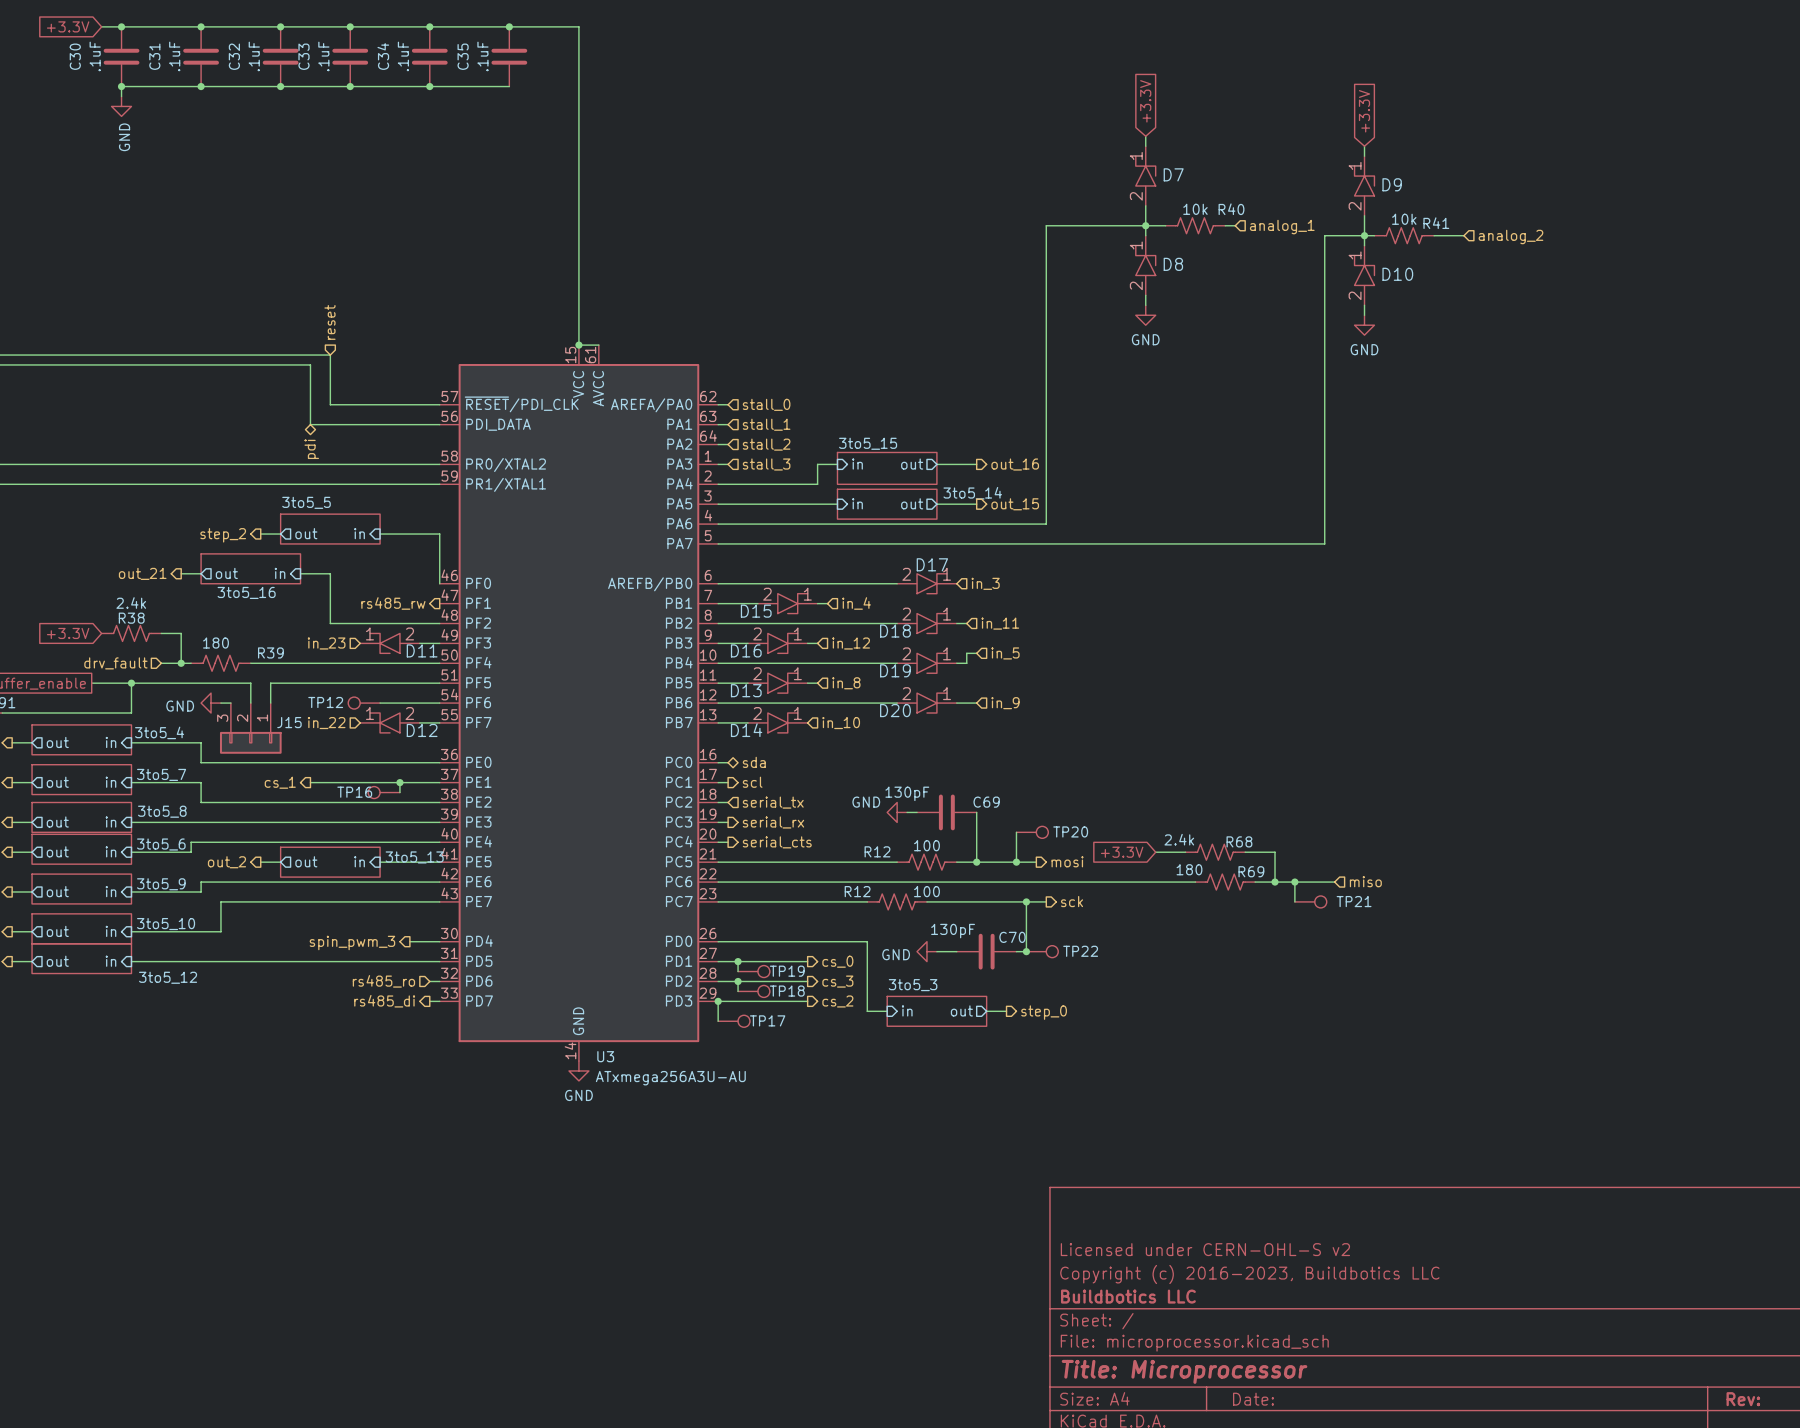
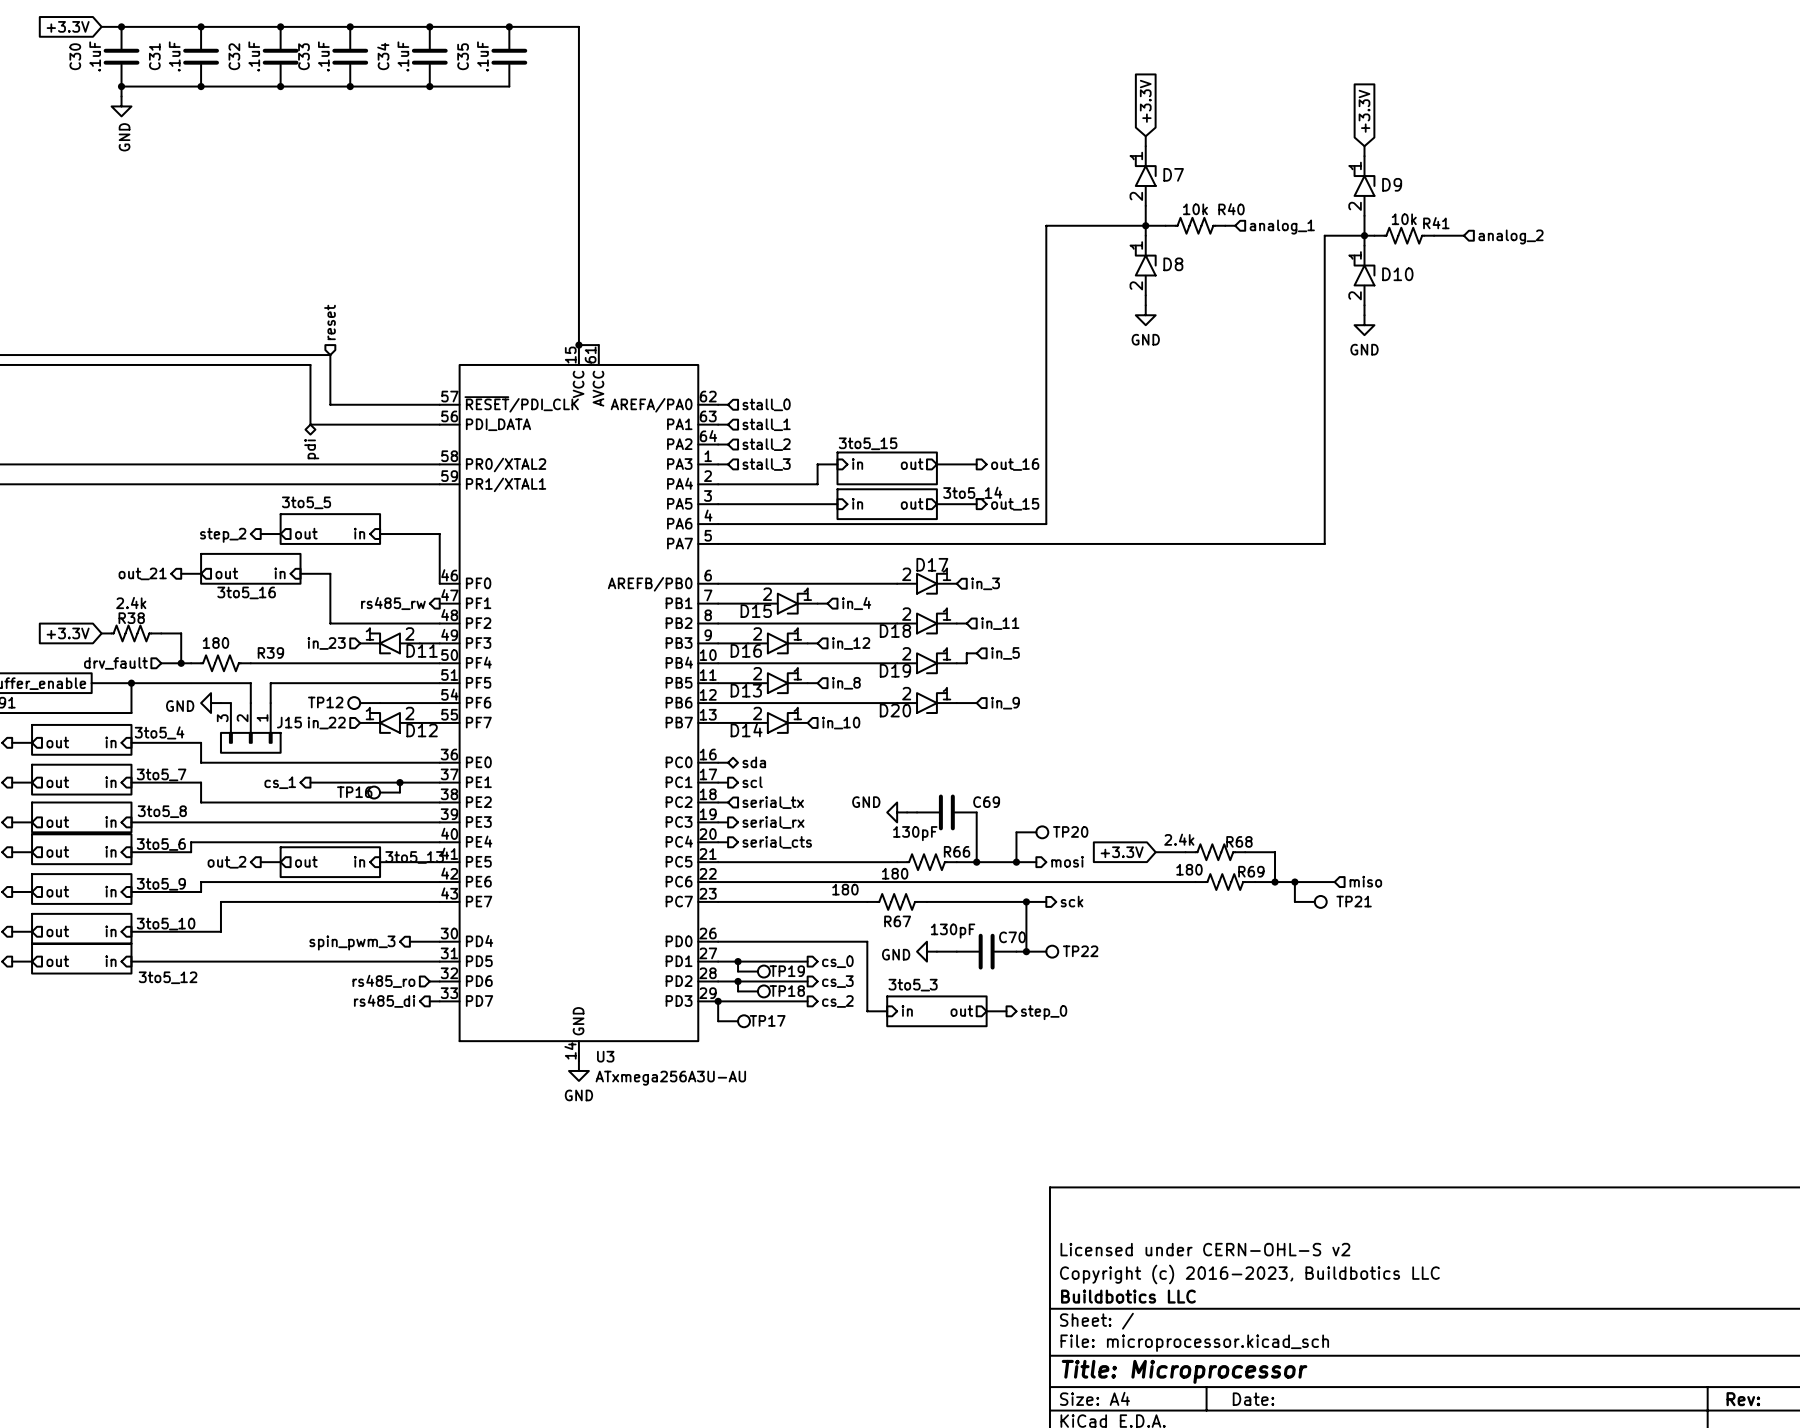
C69 value position: 130pF (907, 793) -> 130pF (915, 833)
R12 value: 100 (926, 845) -> 180 (895, 873)
R12 name: R12 (877, 851) -> R66 (957, 851)
R12 name: R12 (857, 891) -> R67 (897, 921)
R12 value: 100 (926, 891) -> 180 (845, 889)

